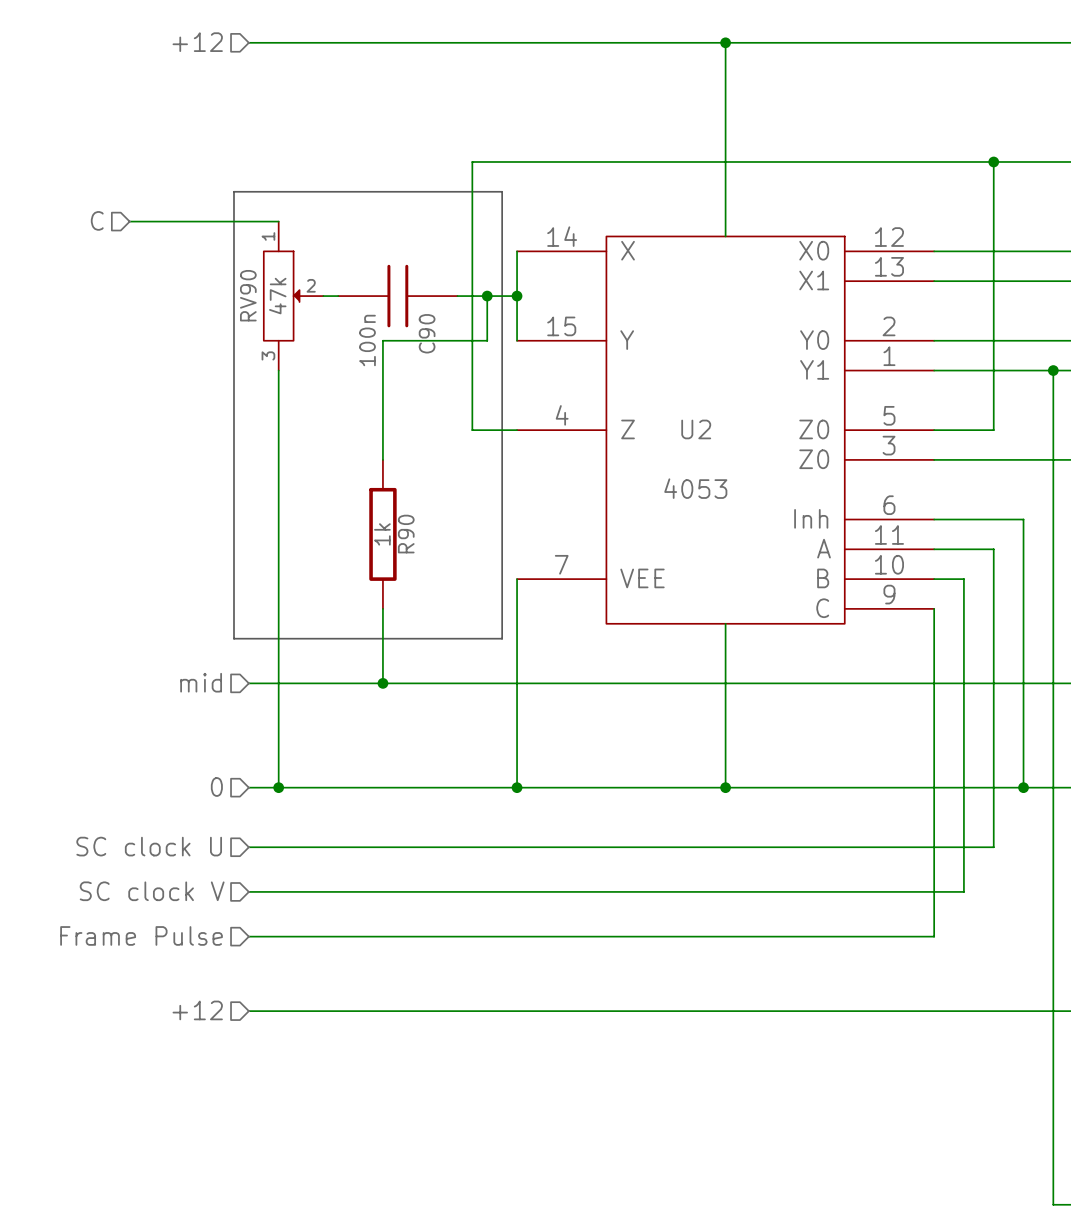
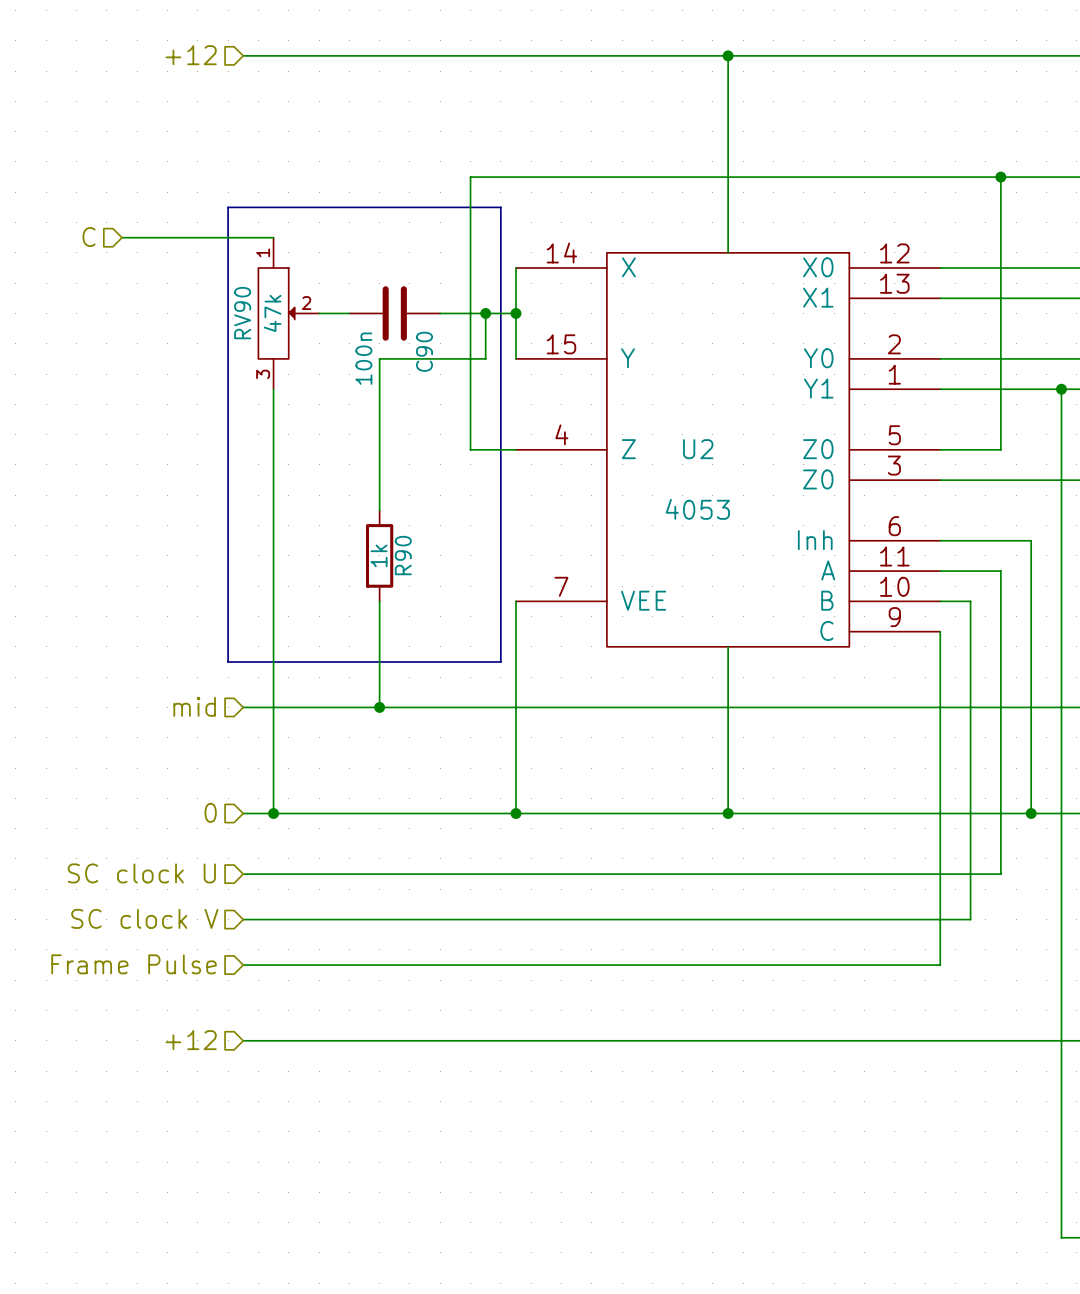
C90 symbol: [338, 264, 458, 328] -> [349, 286, 441, 341]
R90 symbol: [369, 459, 397, 609] -> [365, 510, 394, 602]

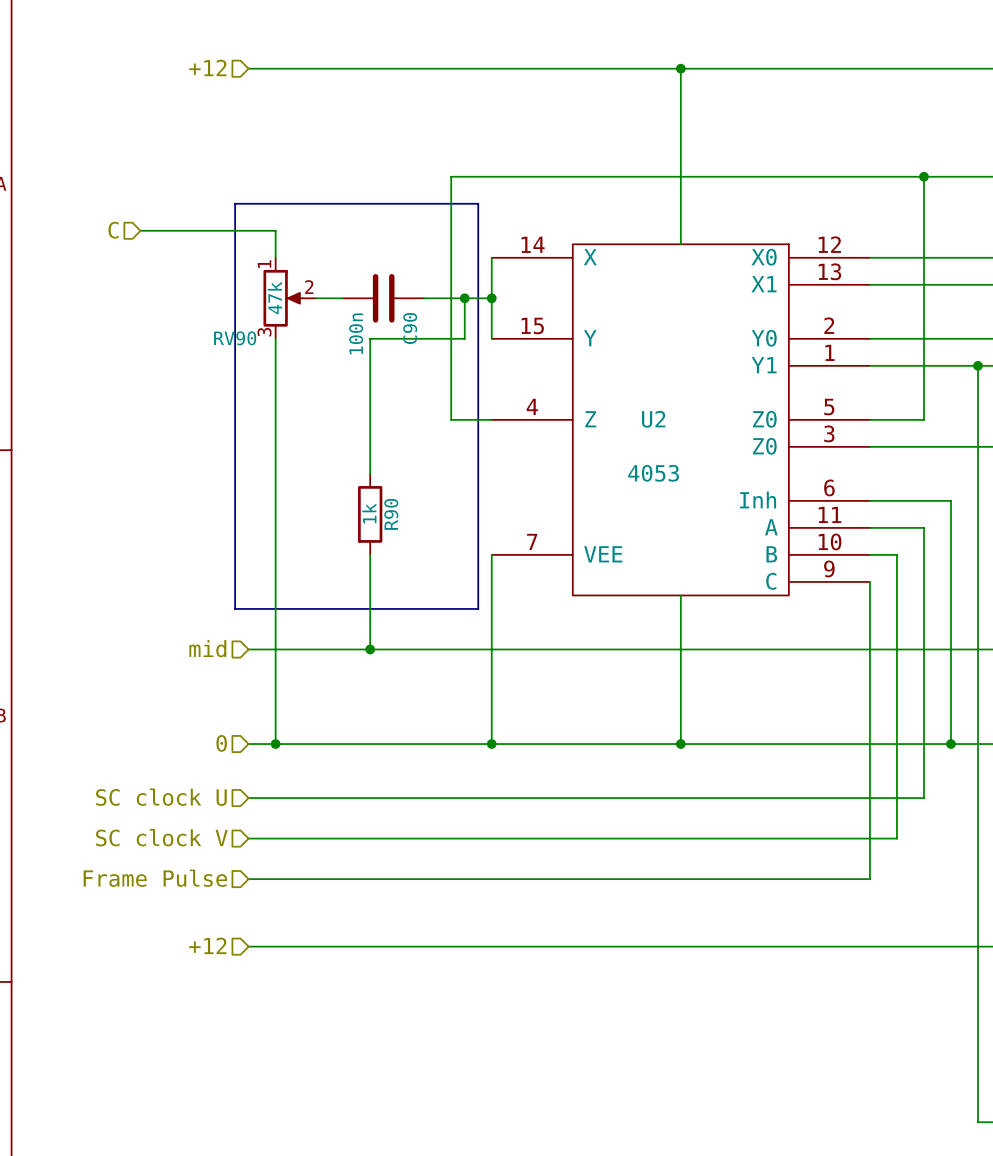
RV90 symbol: [258, 237, 320, 390] -> [263, 257, 317, 339]
RV90 name position: RV90 (242, 313) -> RV90 (235, 338)

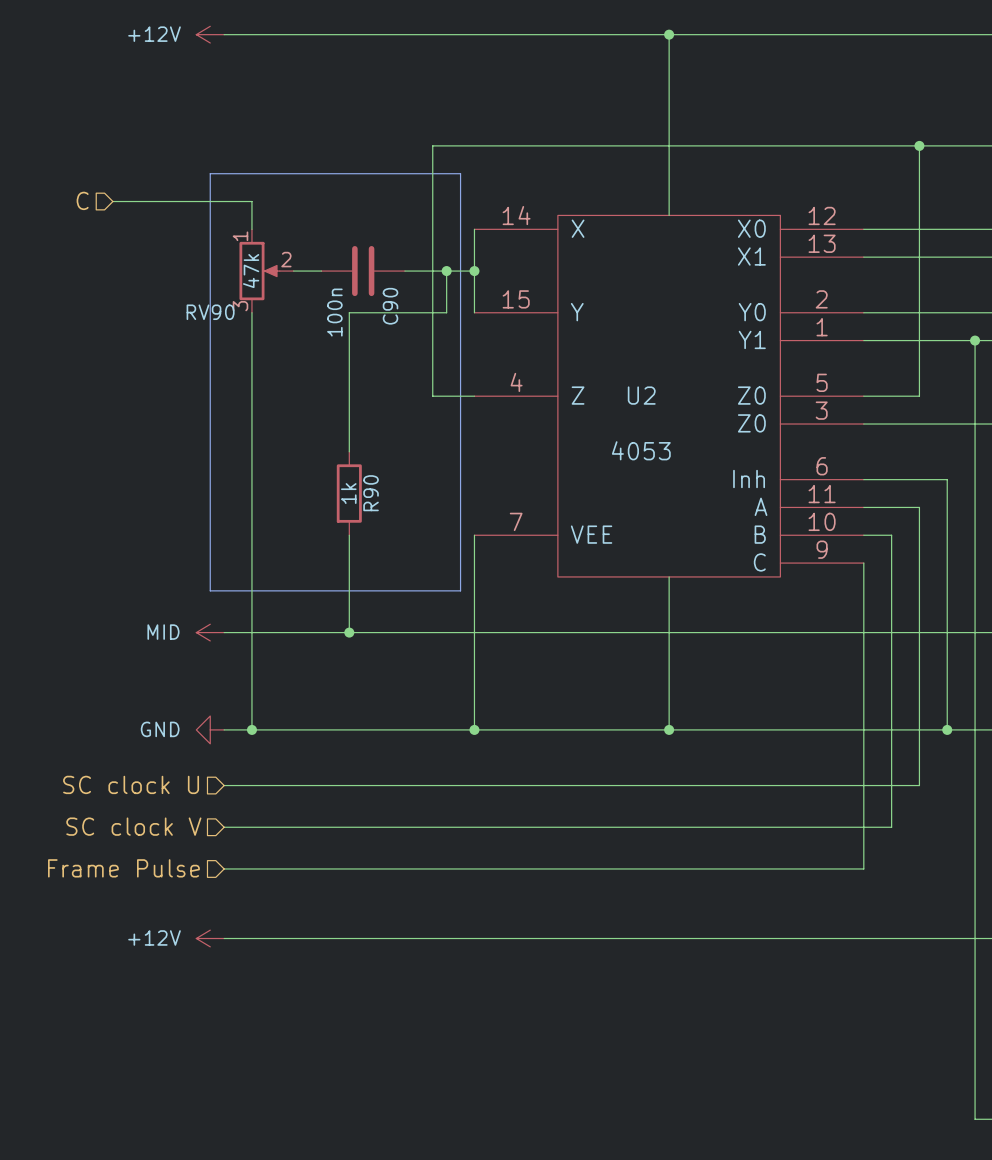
hierarchical label: +12 (207, 67) -> none
power symbol: none -> +12V (210, 34)
hierarchical label: mid (207, 648) -> none
power symbol: none -> MID (210, 632)
hierarchical label: 0 (221, 743) -> none
power symbol: none -> GND (210, 729)
hierarchical label: +12 (207, 945) -> none
power symbol: none -> +12V (210, 938)

